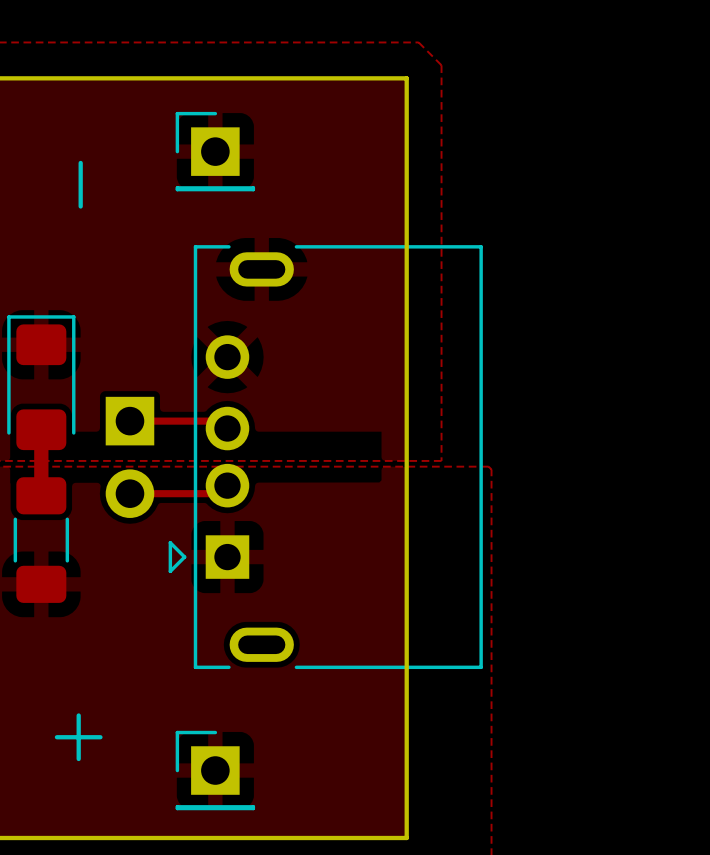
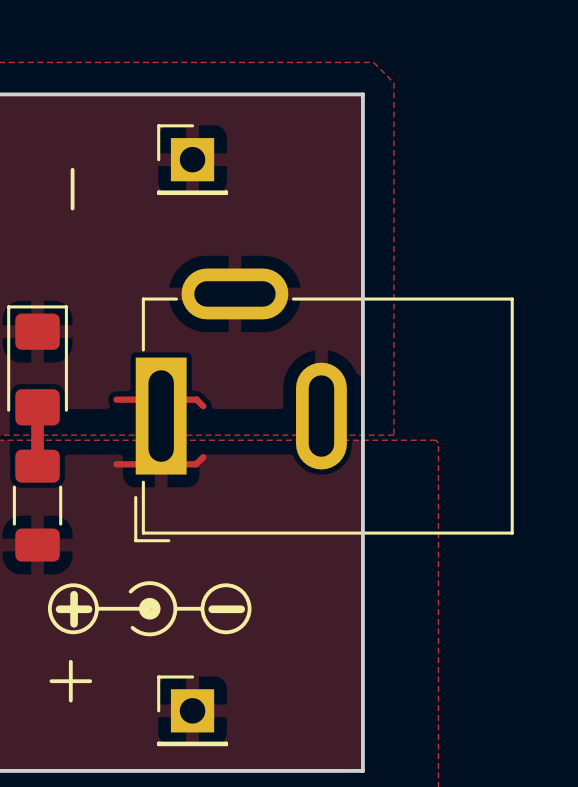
part: none -> (323, 405)
part: (129, 457) -> none
part: (325, 457) -> none
drawing: none -> [47, 581, 252, 637]
text: none -> + (74, 609)
text: none -> - (226, 609)

